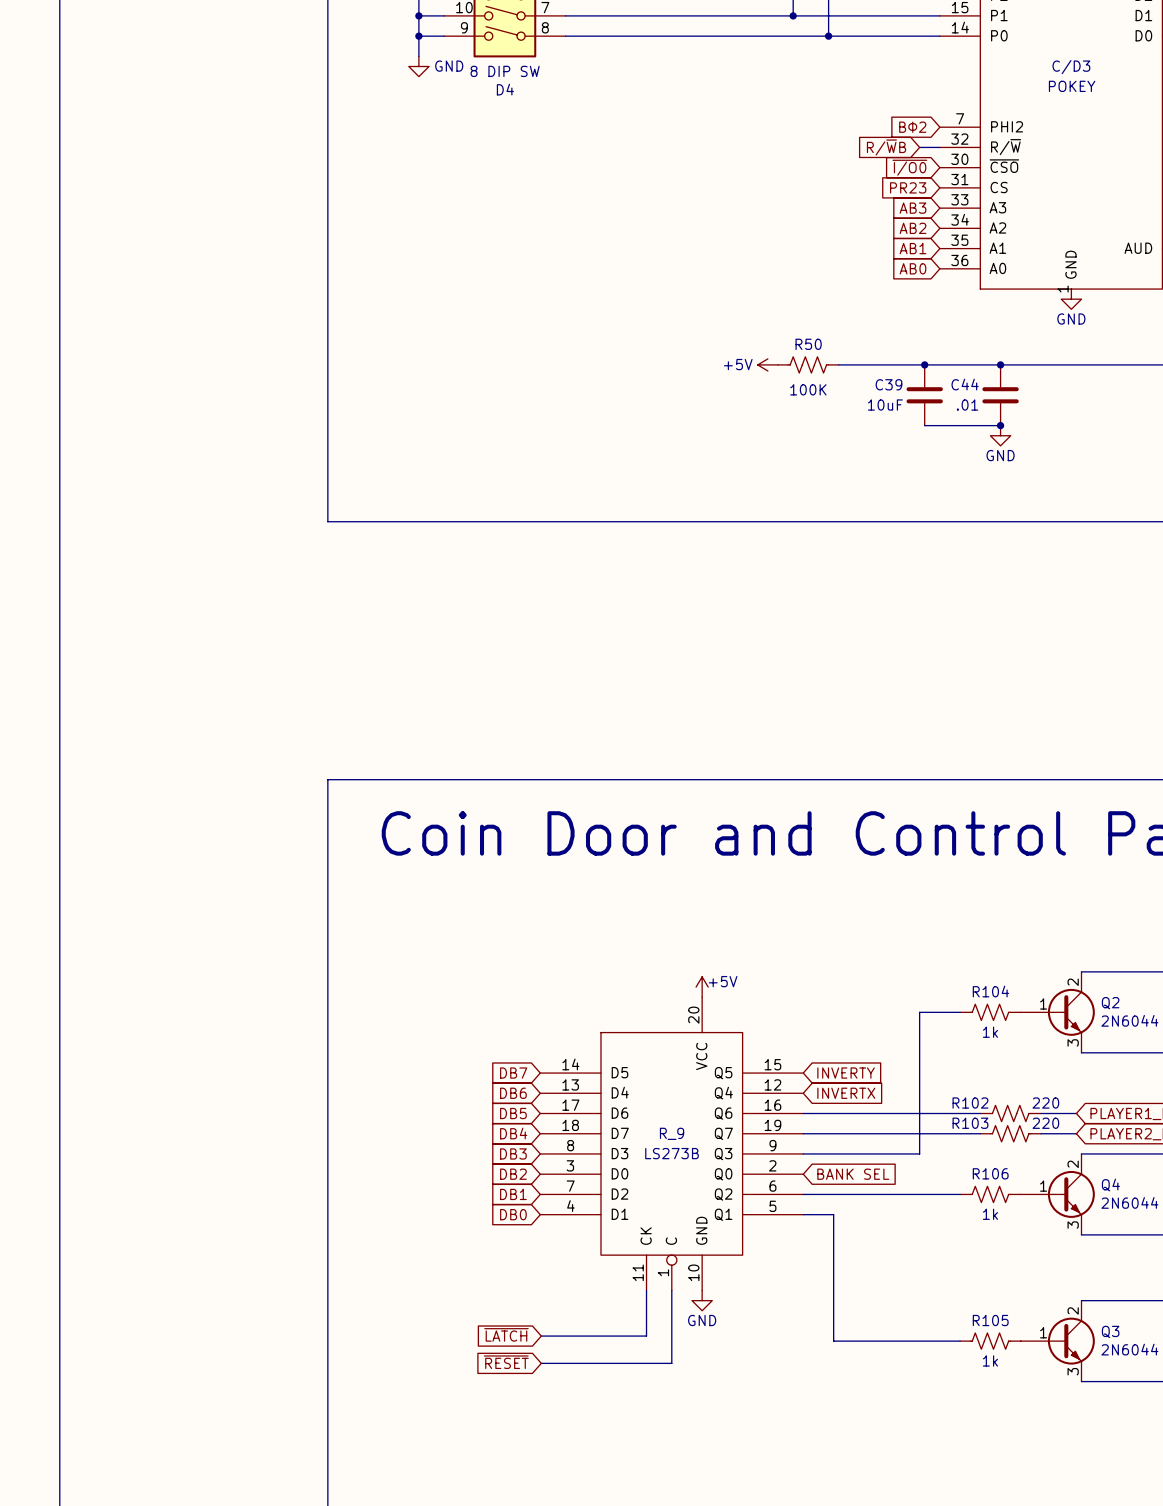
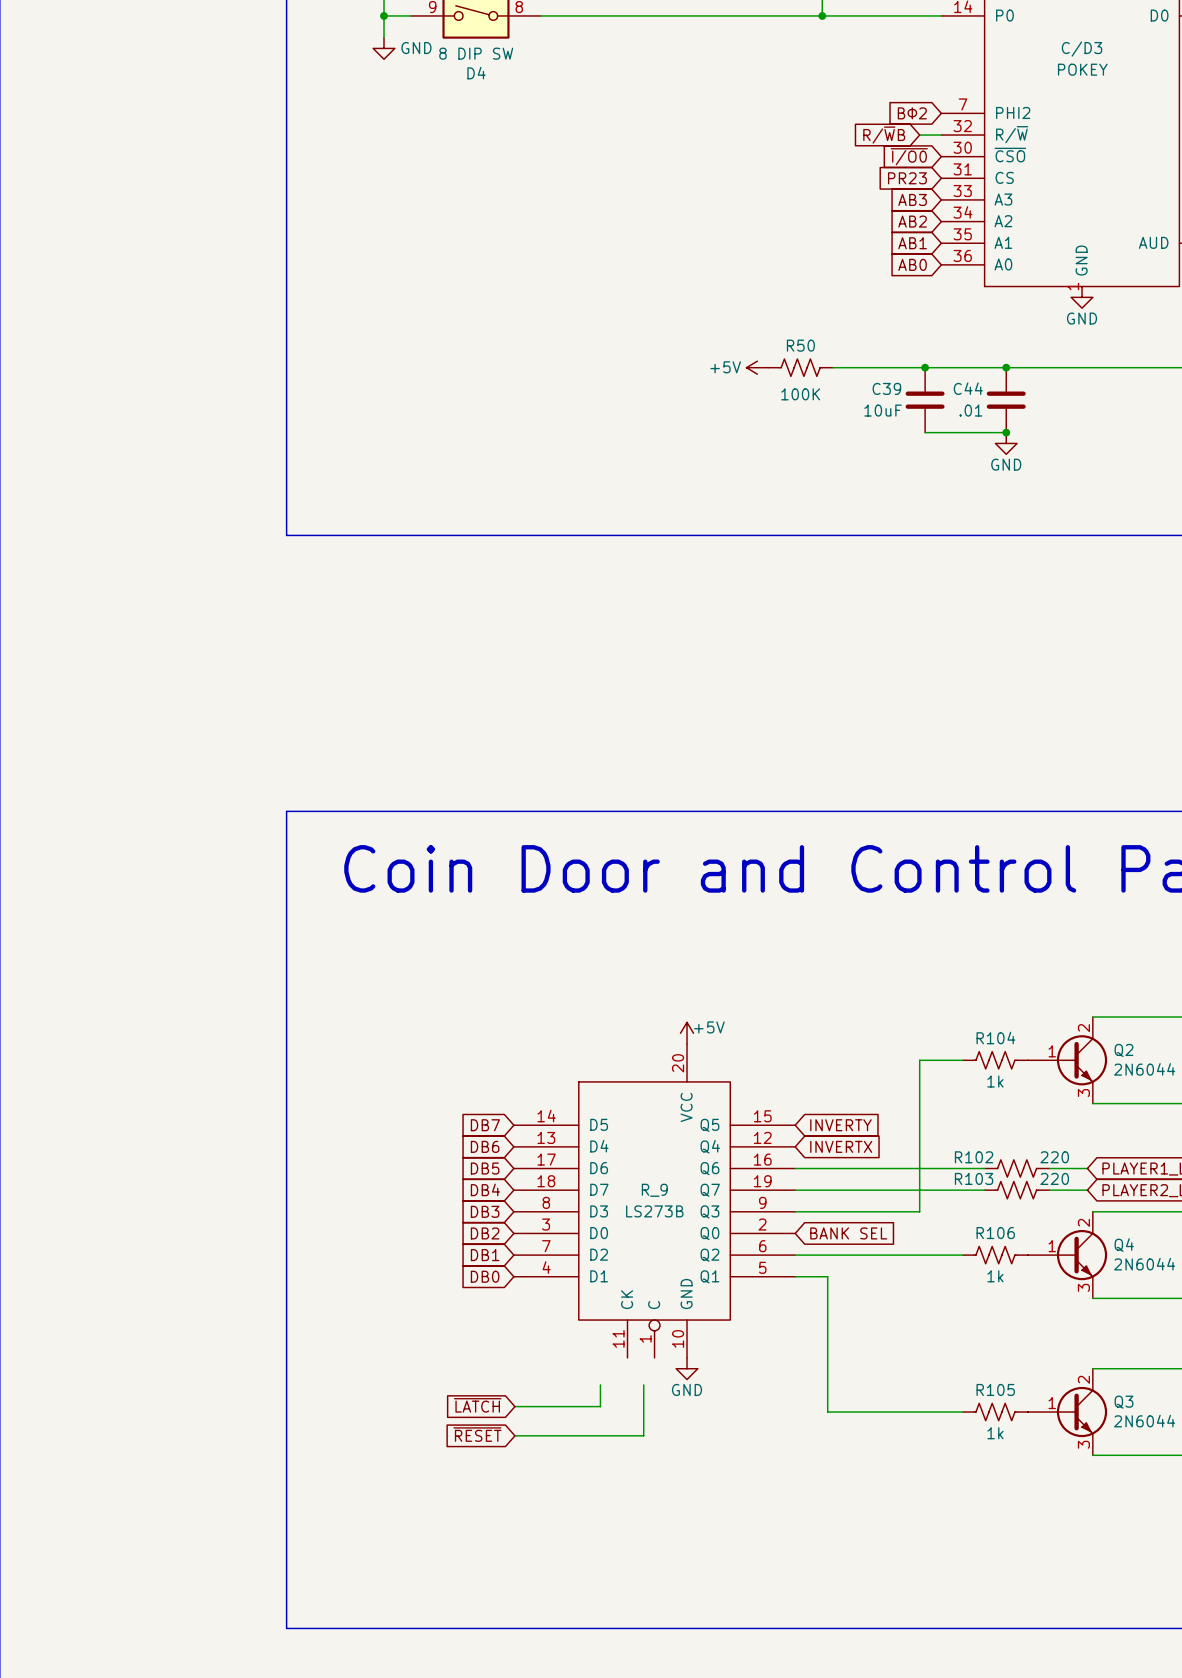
wire: (646, 1290) (646, 1336) (621, 1336) -> (600, 1384) (600, 1406)
wire: (671, 1290) (671, 1363) (661, 1363) -> (643, 1384) (643, 1435)

